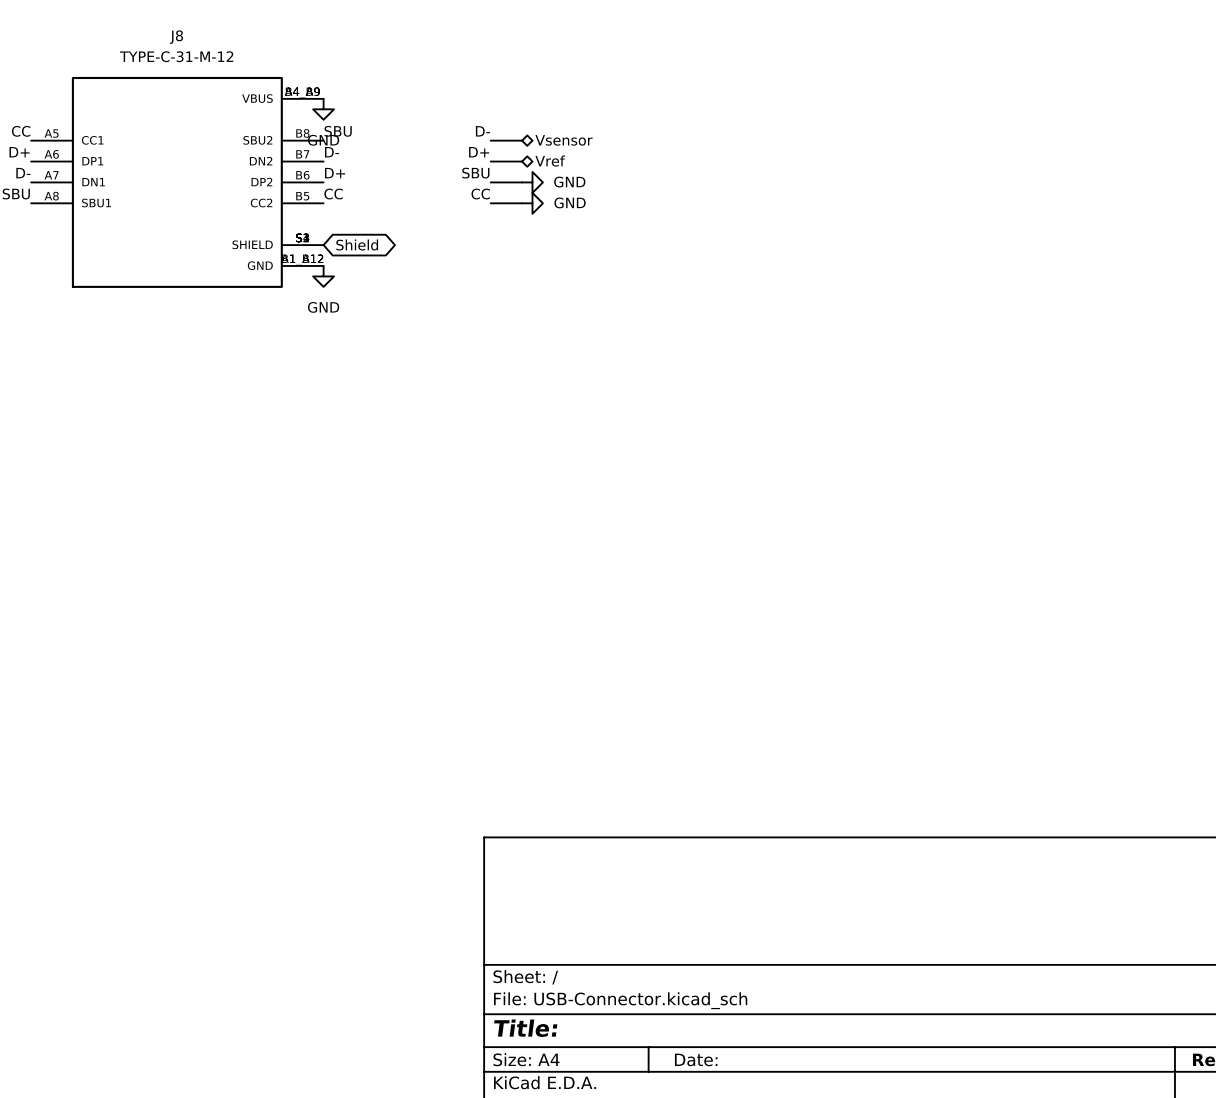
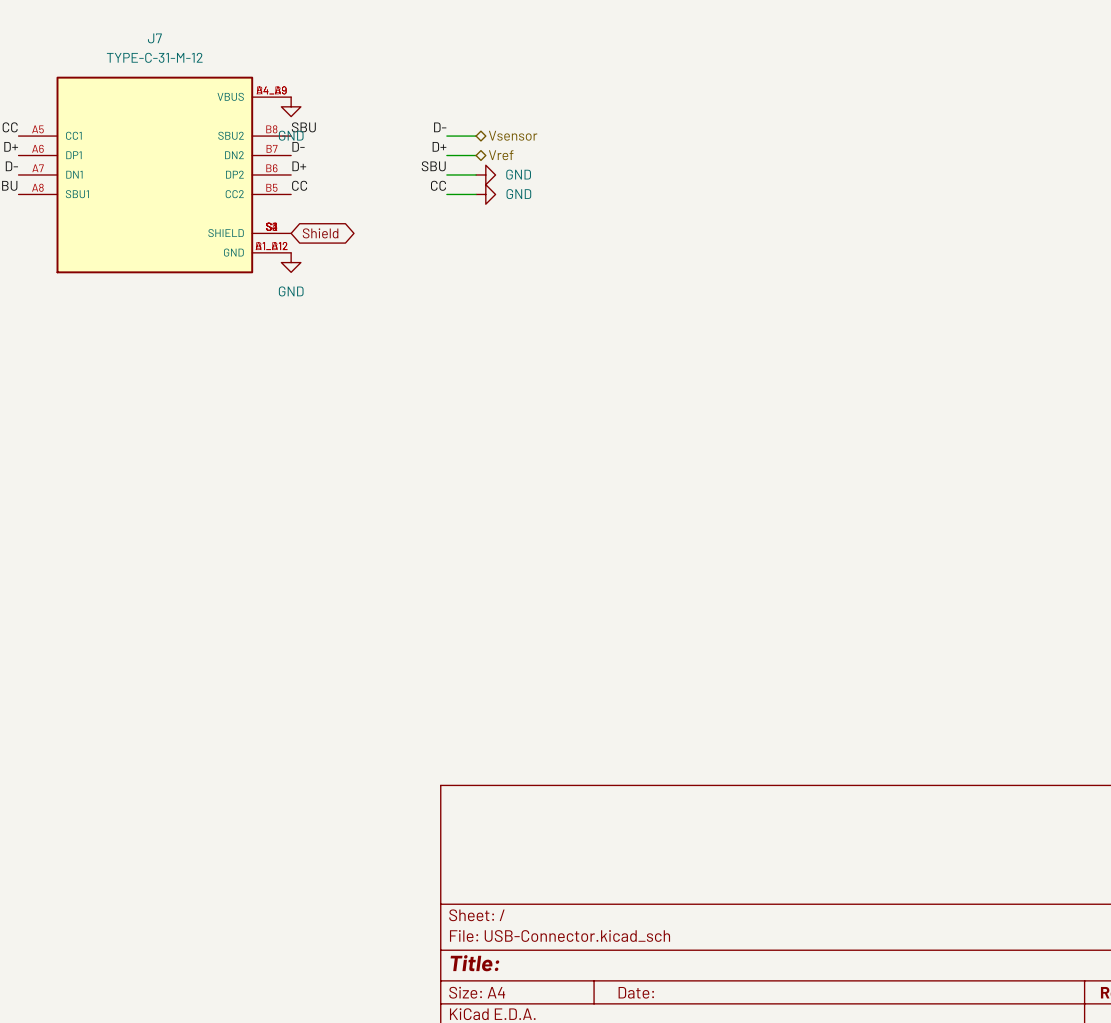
J8 name: J8 (176, 37) -> J7 (154, 38)

